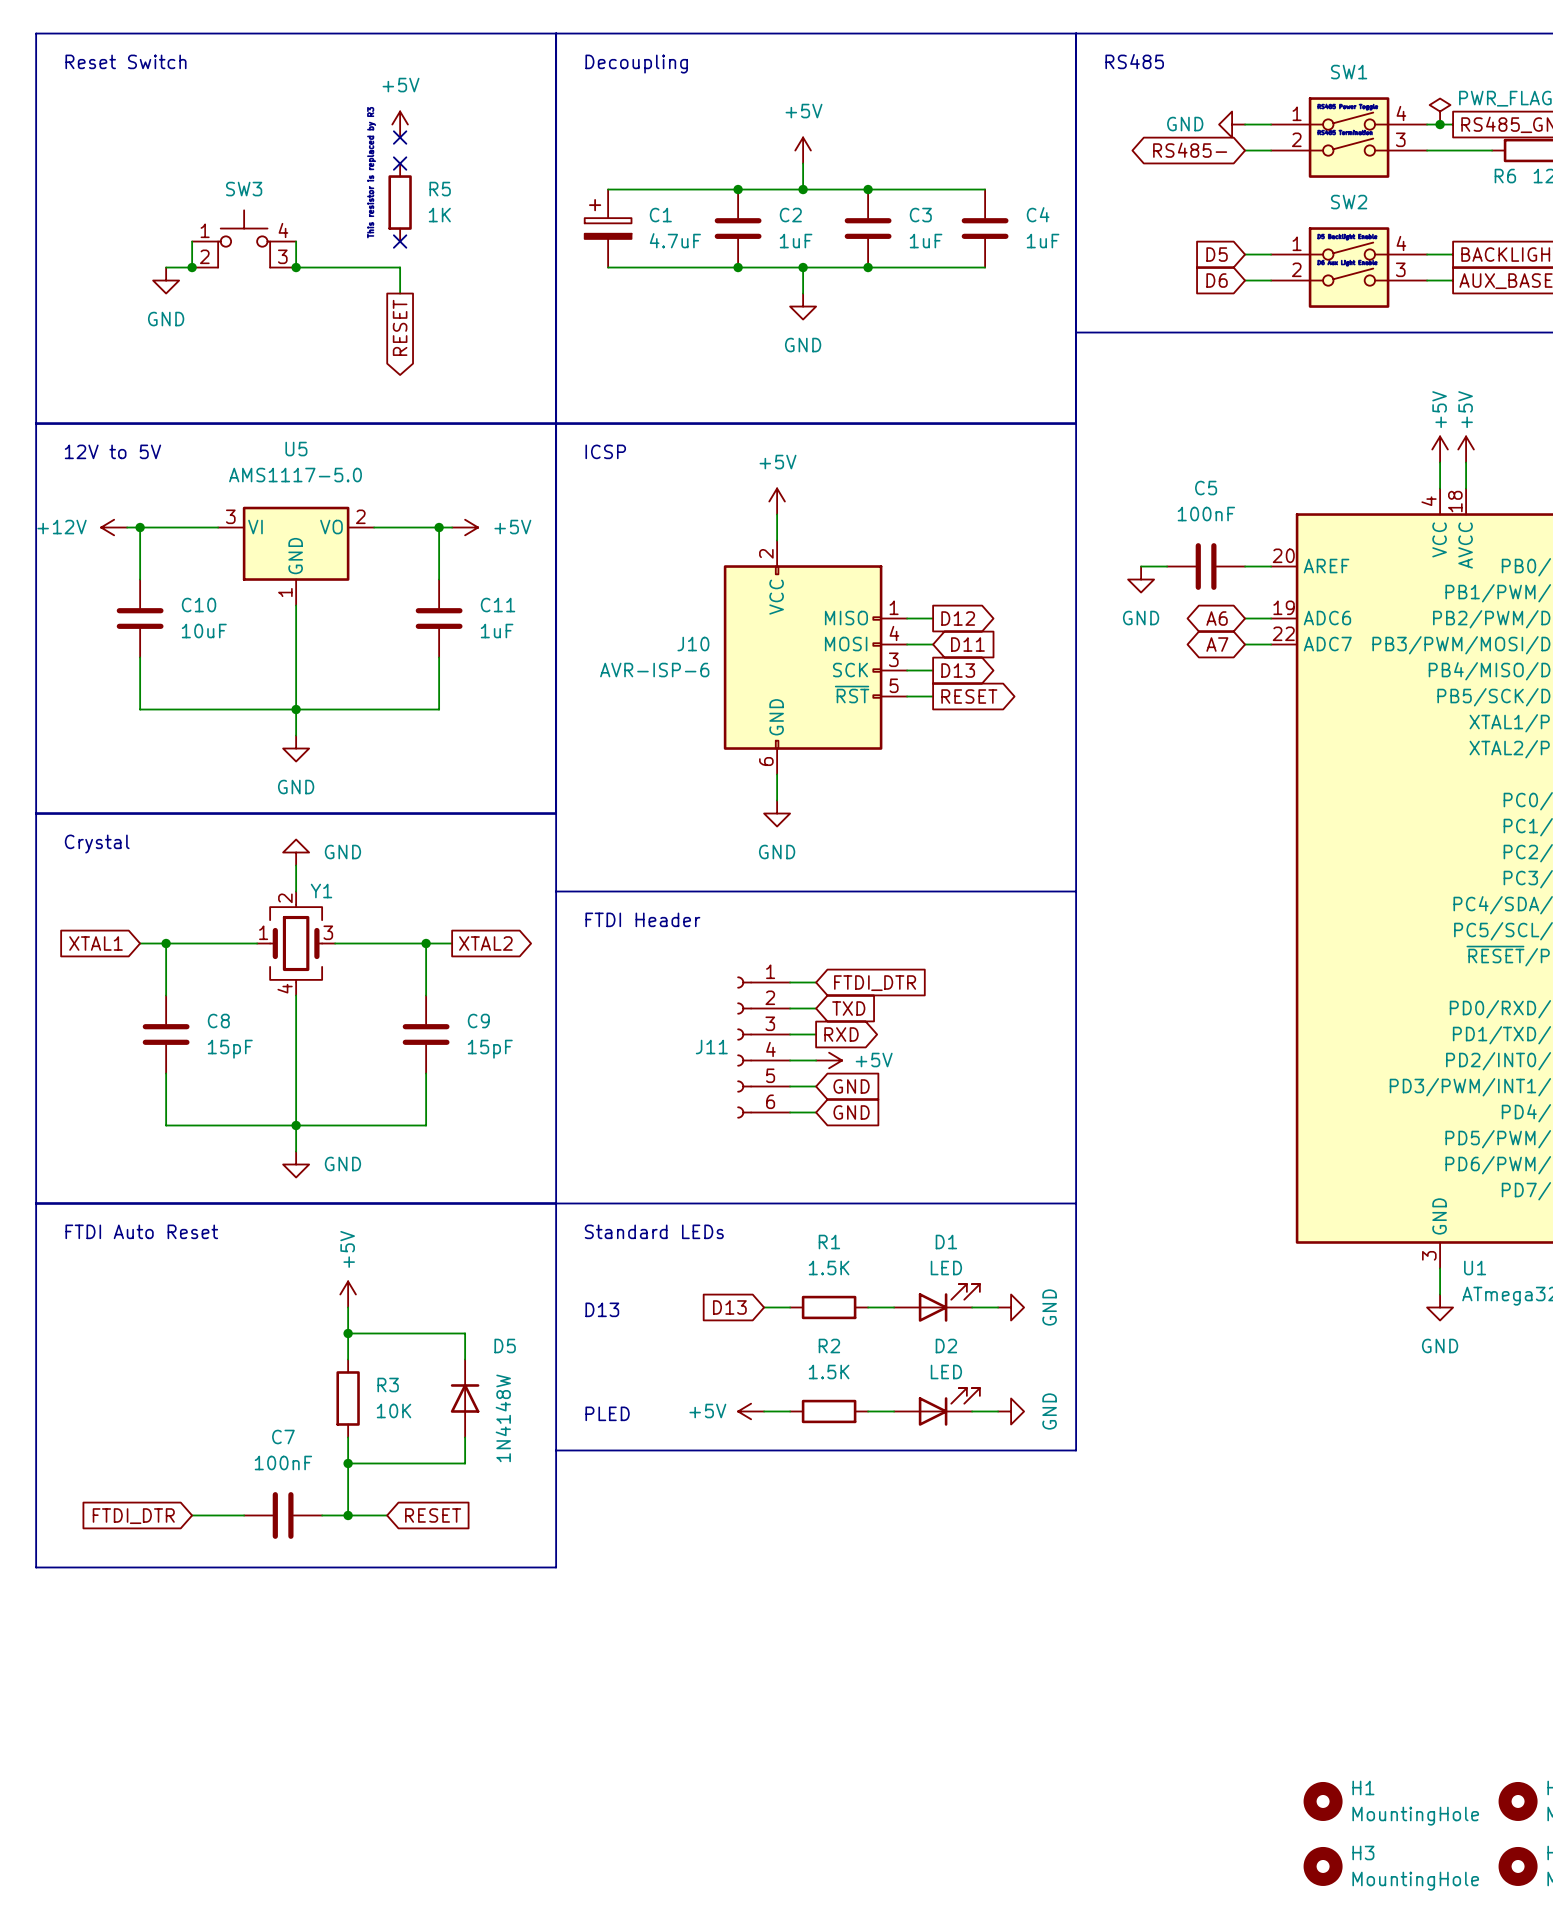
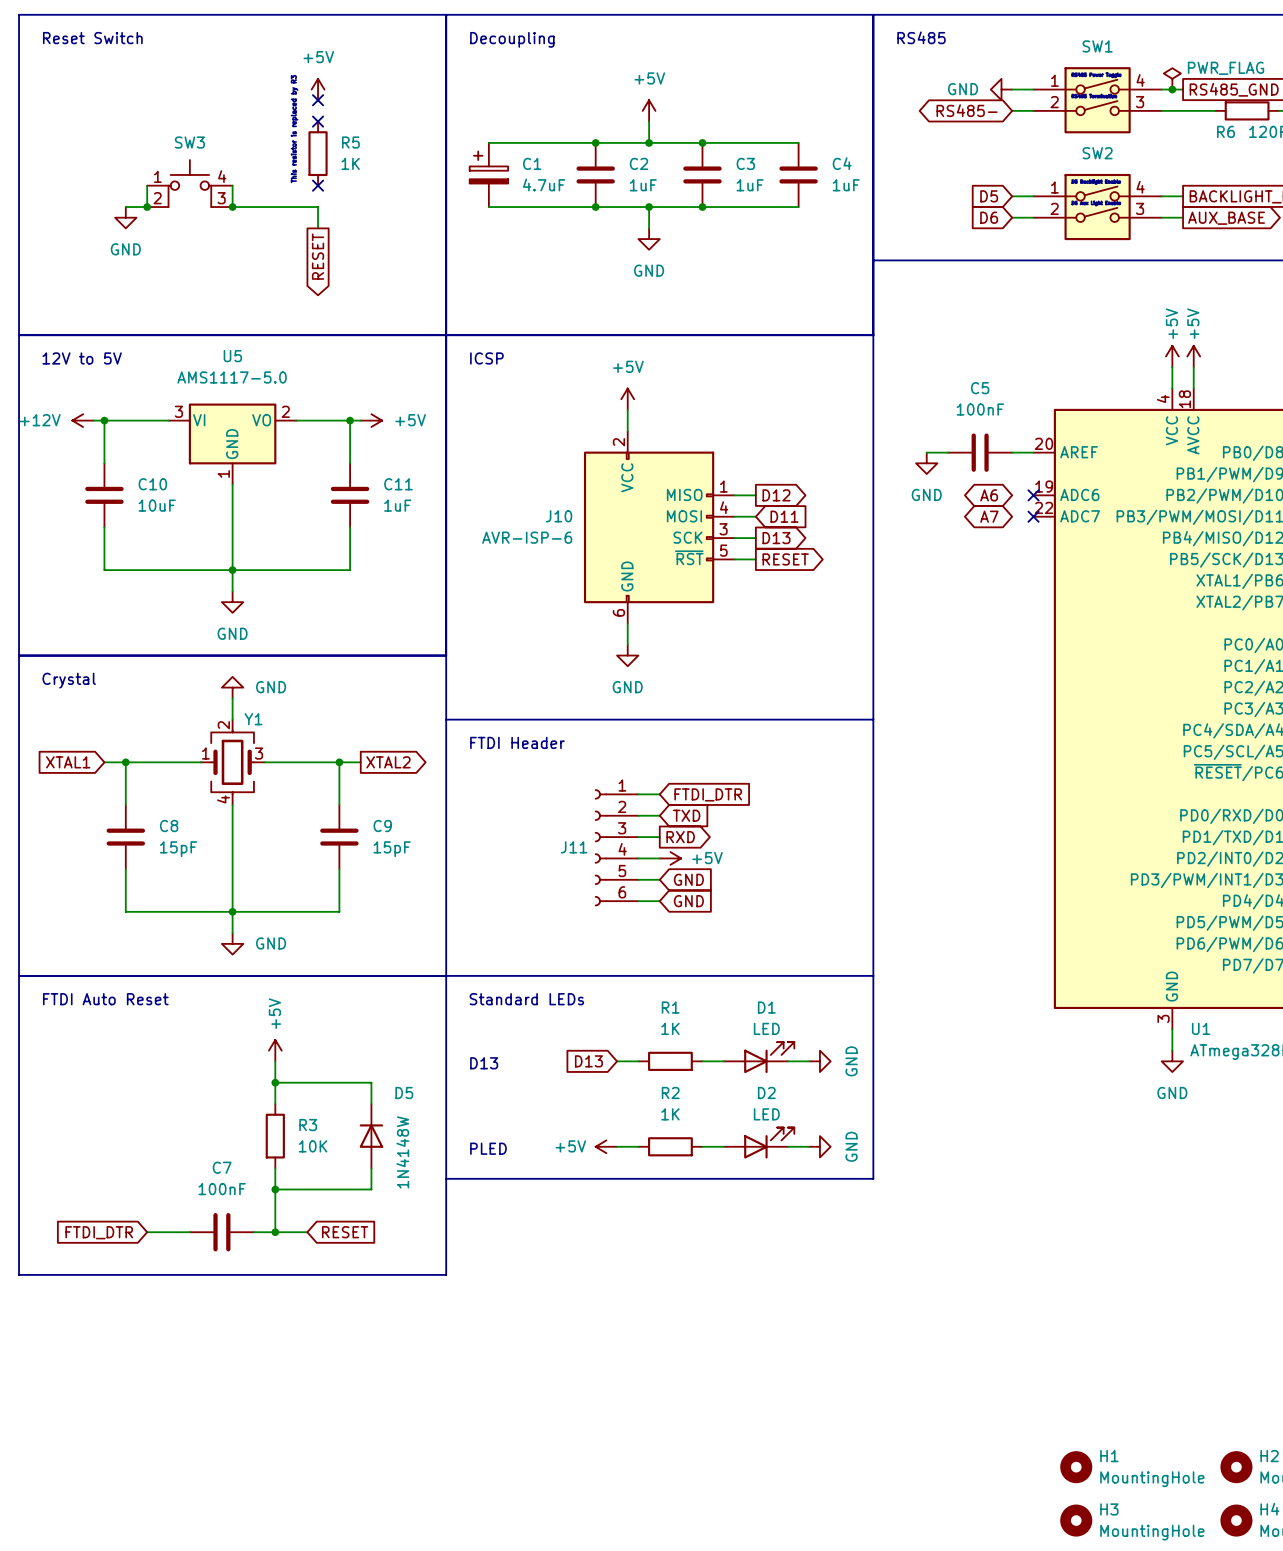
wire: (1245, 618) (1271, 618) -> none
no-connect mark: none -> (1033, 495)
wire: (1245, 644) (1271, 644) -> none
no-connect mark: none -> (1033, 516)
R1 value: 1.5K (829, 1268) -> 1K (670, 1028)
R2 value: 1.5K (829, 1372) -> 1K (670, 1114)

